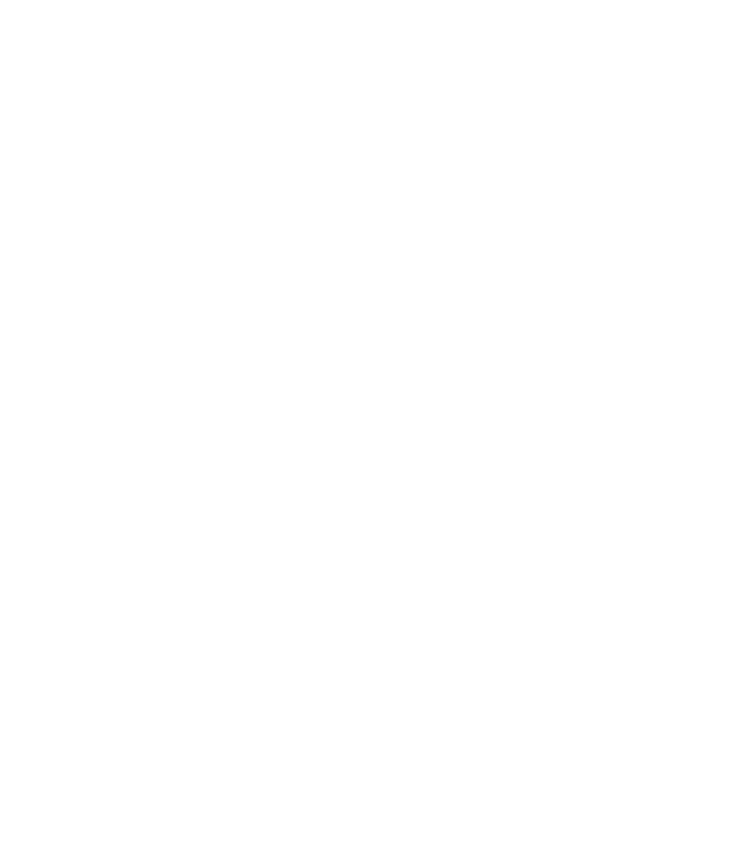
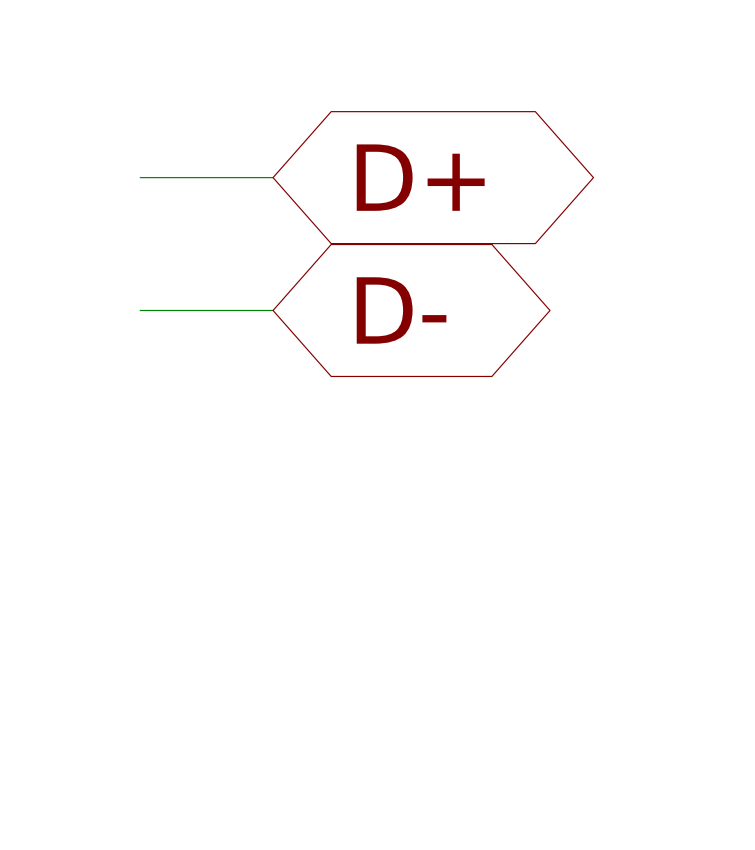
wire: none -> (140, 177) (273, 177)
global label: none -> D+ (420, 177)
wire: none -> (140, 310) (273, 310)
global label: none -> D- (401, 310)

